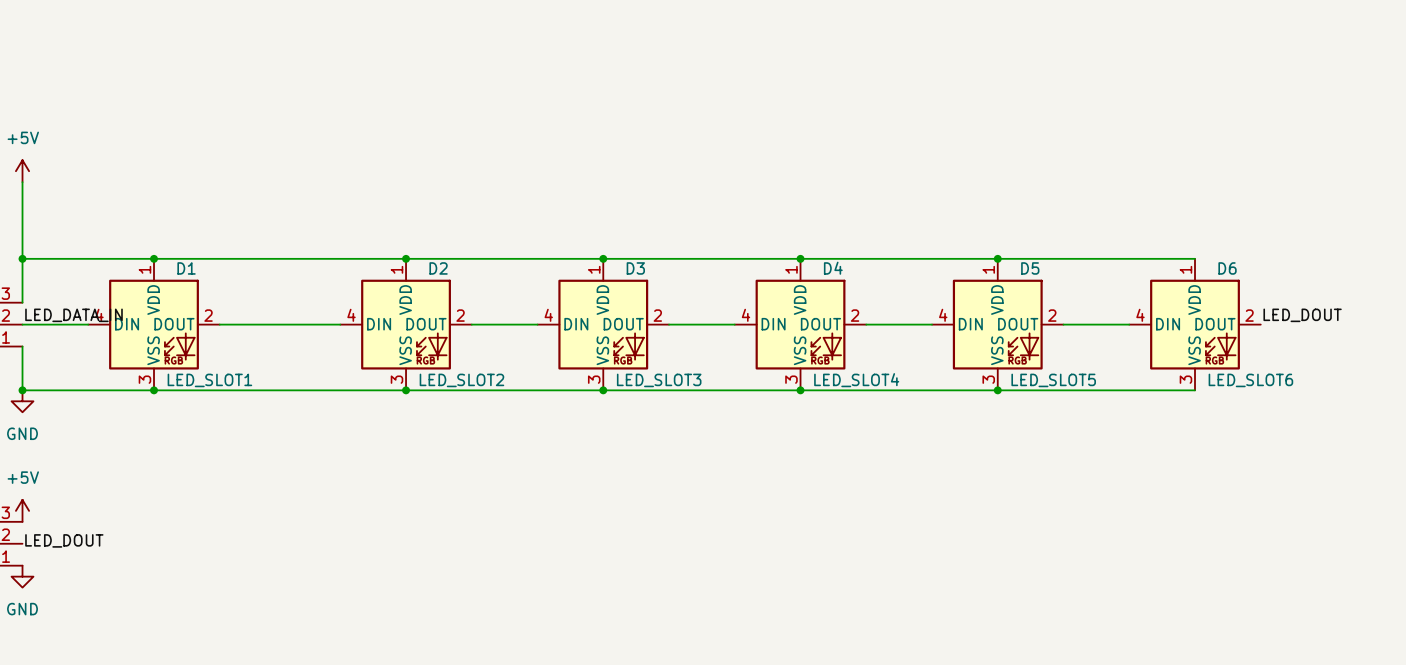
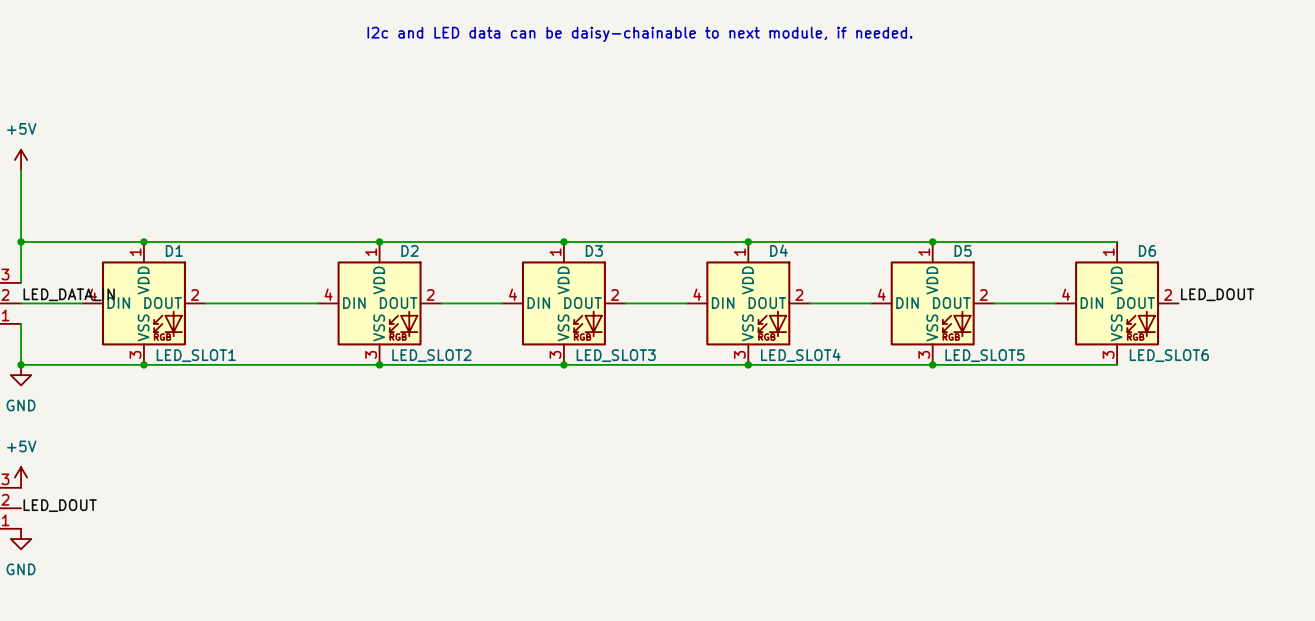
text: none -> I2c and LED data can be daisy-chainable to next module, if needed. (639, 34)

